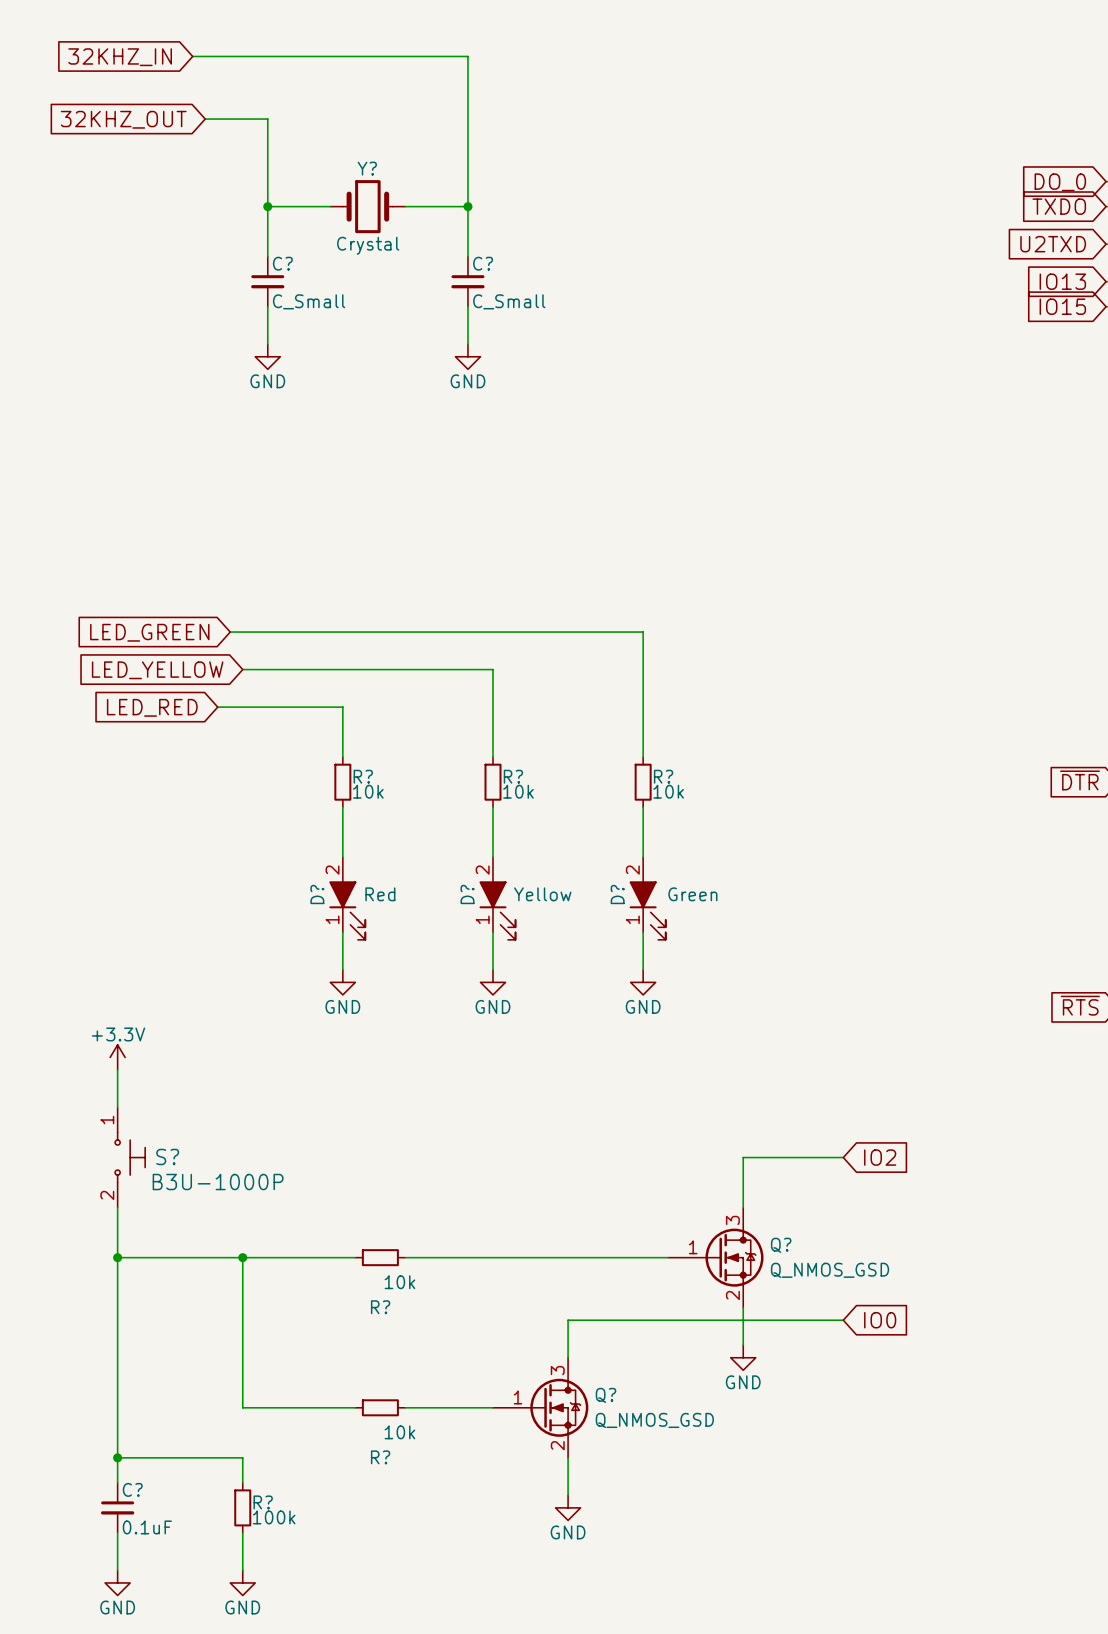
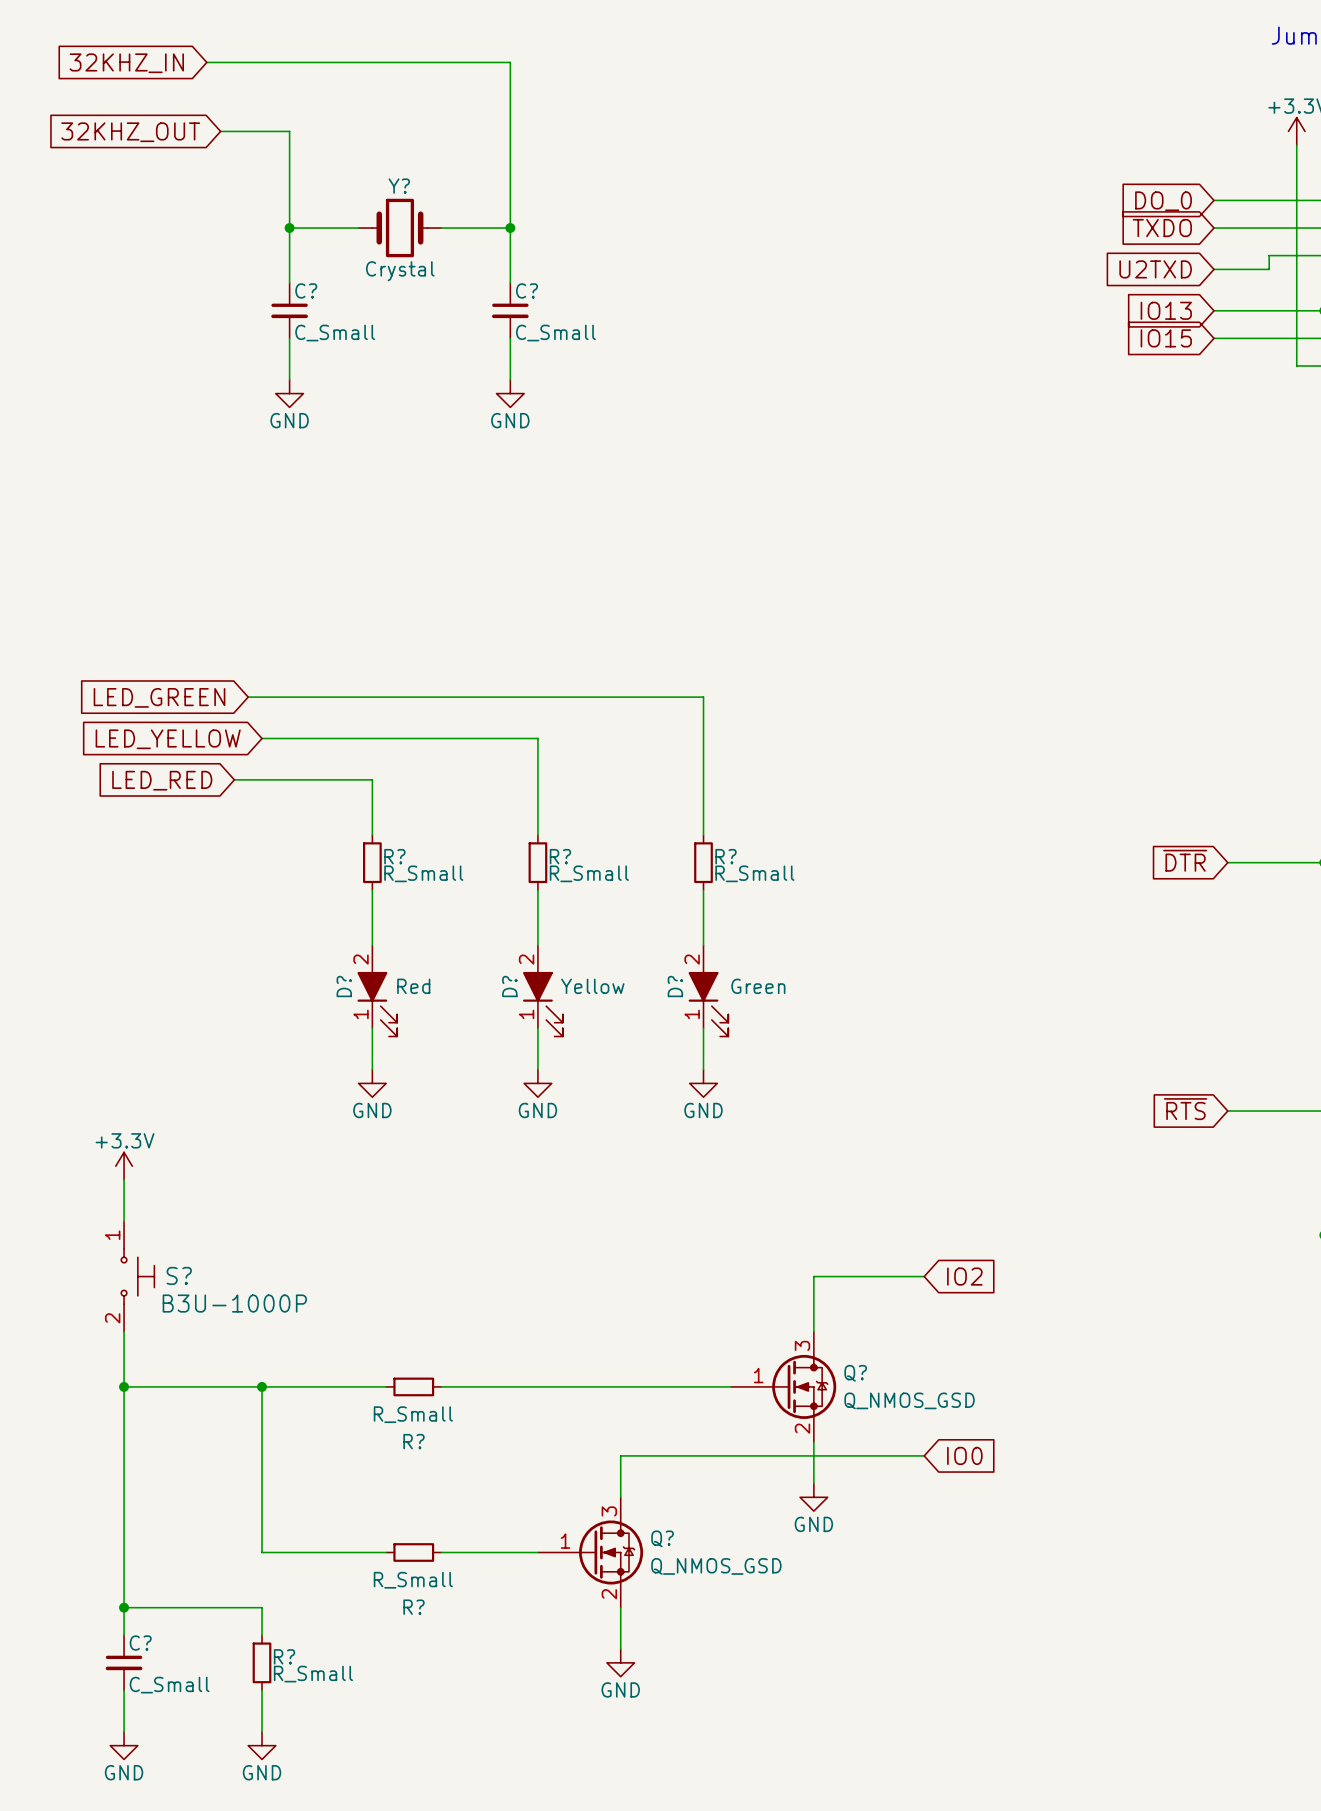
R? value: 10k (368, 791) -> R_Small (423, 873)
R? value: 10k (518, 791) -> R_Small (589, 873)
R? value: 10k (668, 791) -> R_Small (754, 873)
R? value: 10k (399, 1282) -> R_Small (413, 1414)
R? value: 10k (399, 1432) -> R_Small (413, 1580)
R? value: 100k (274, 1517) -> R_Small (313, 1674)
C? value: 0.1uF (147, 1527) -> C_Small (169, 1685)

